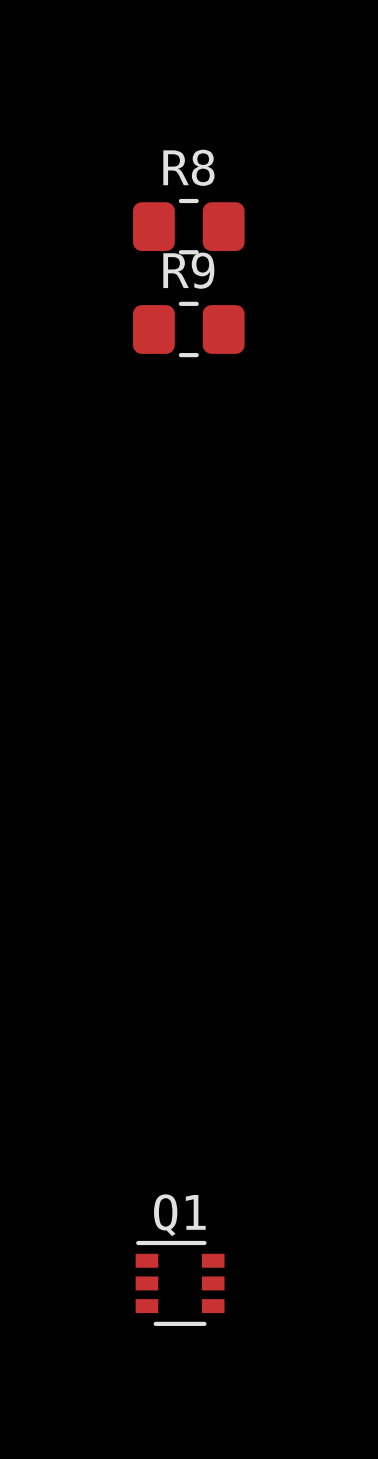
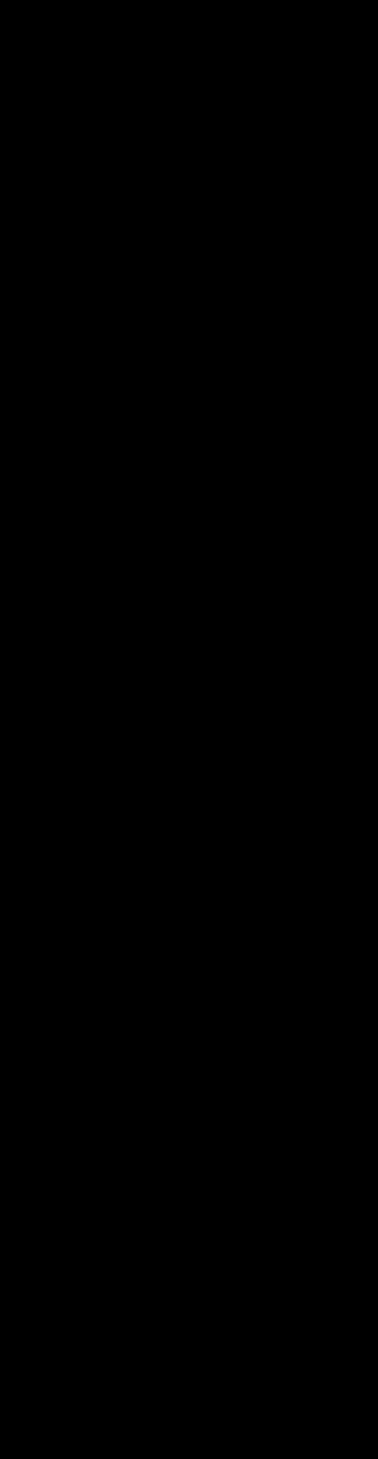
R8: (188, 226) -> none
R9: (188, 329) -> none
Q1: (180, 1283) -> none

